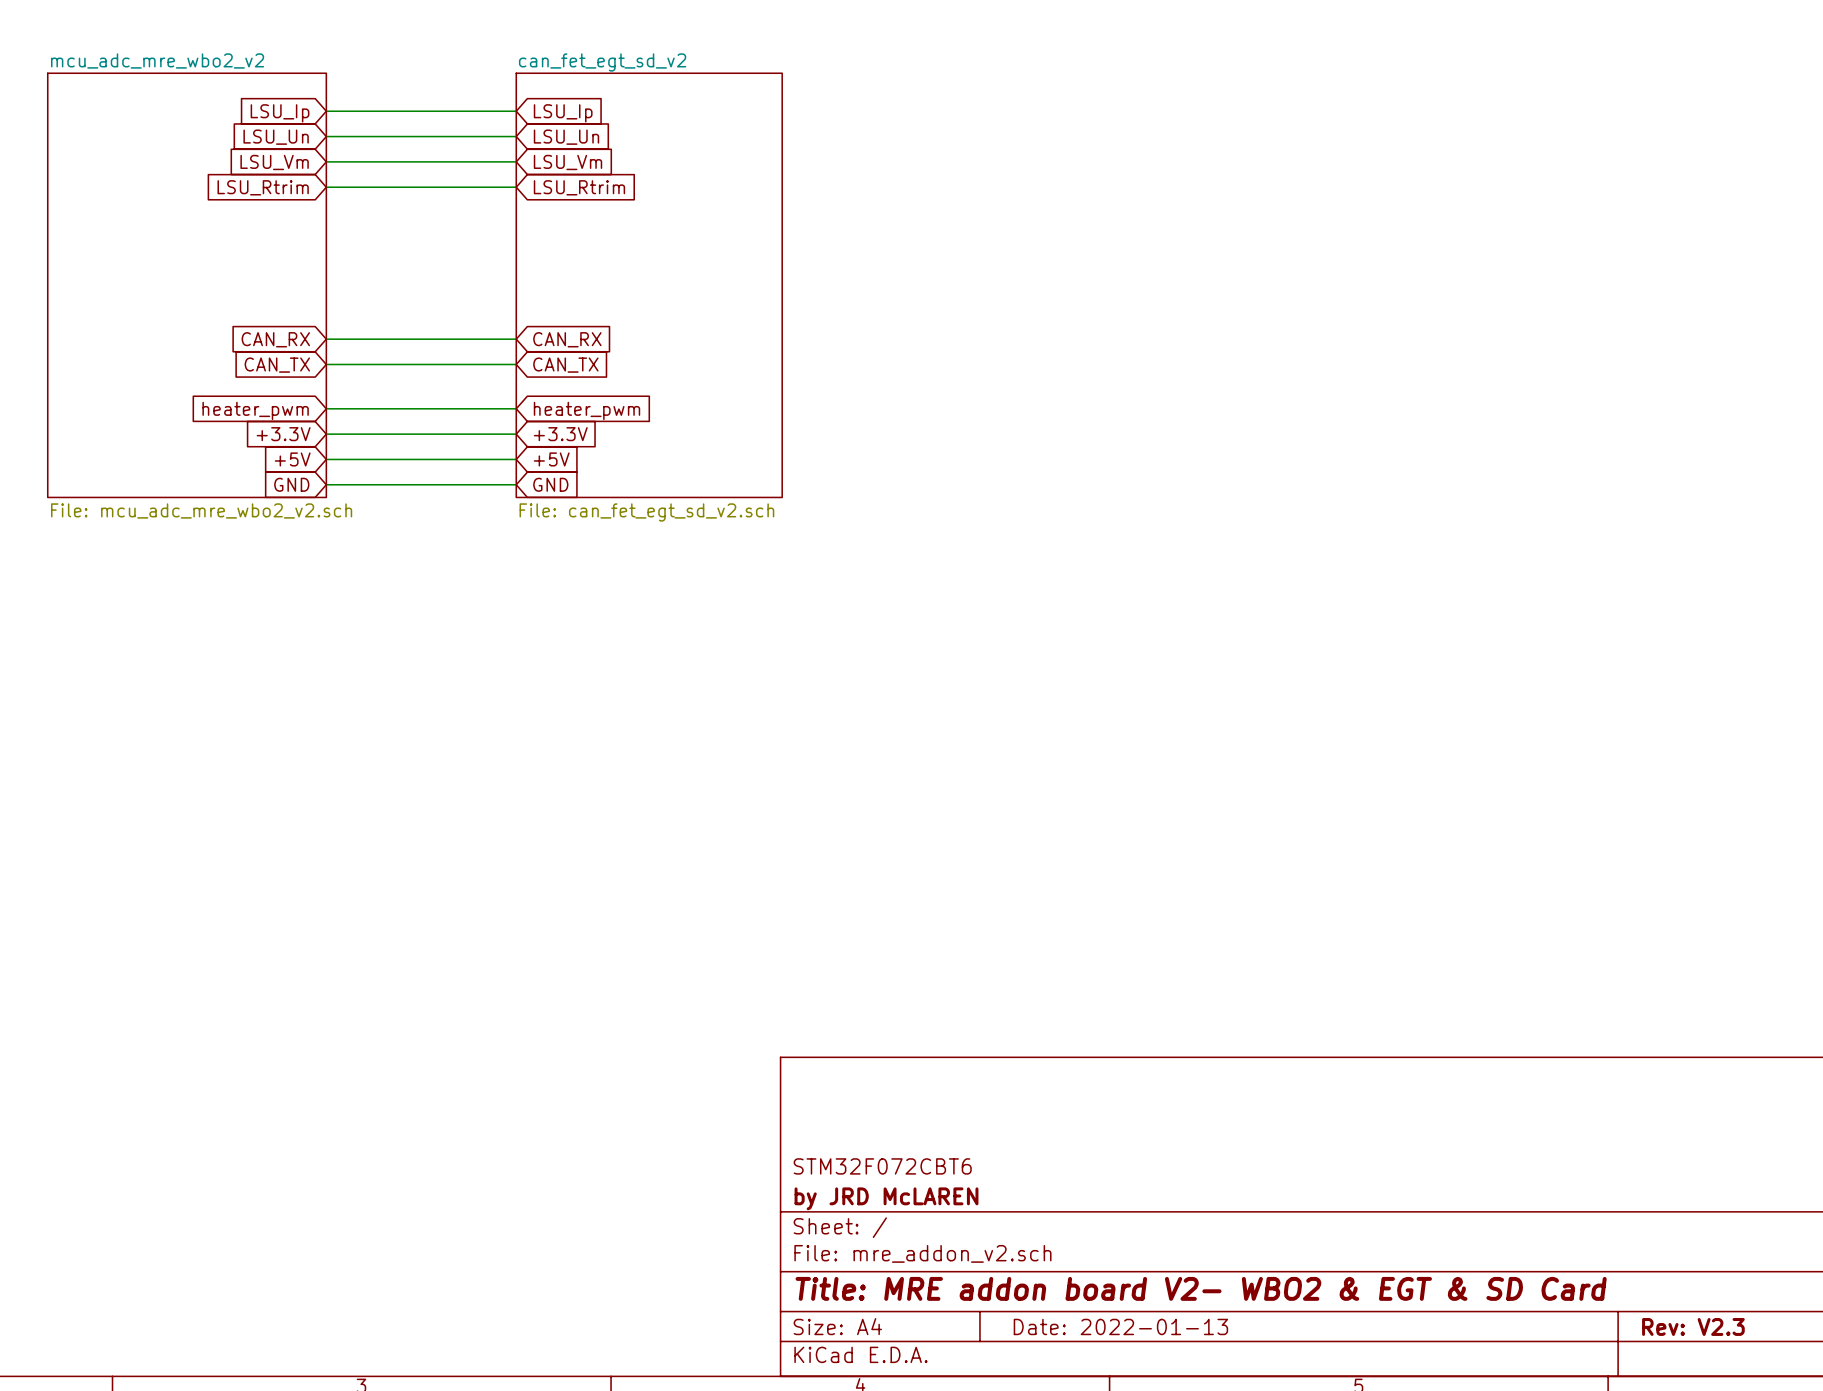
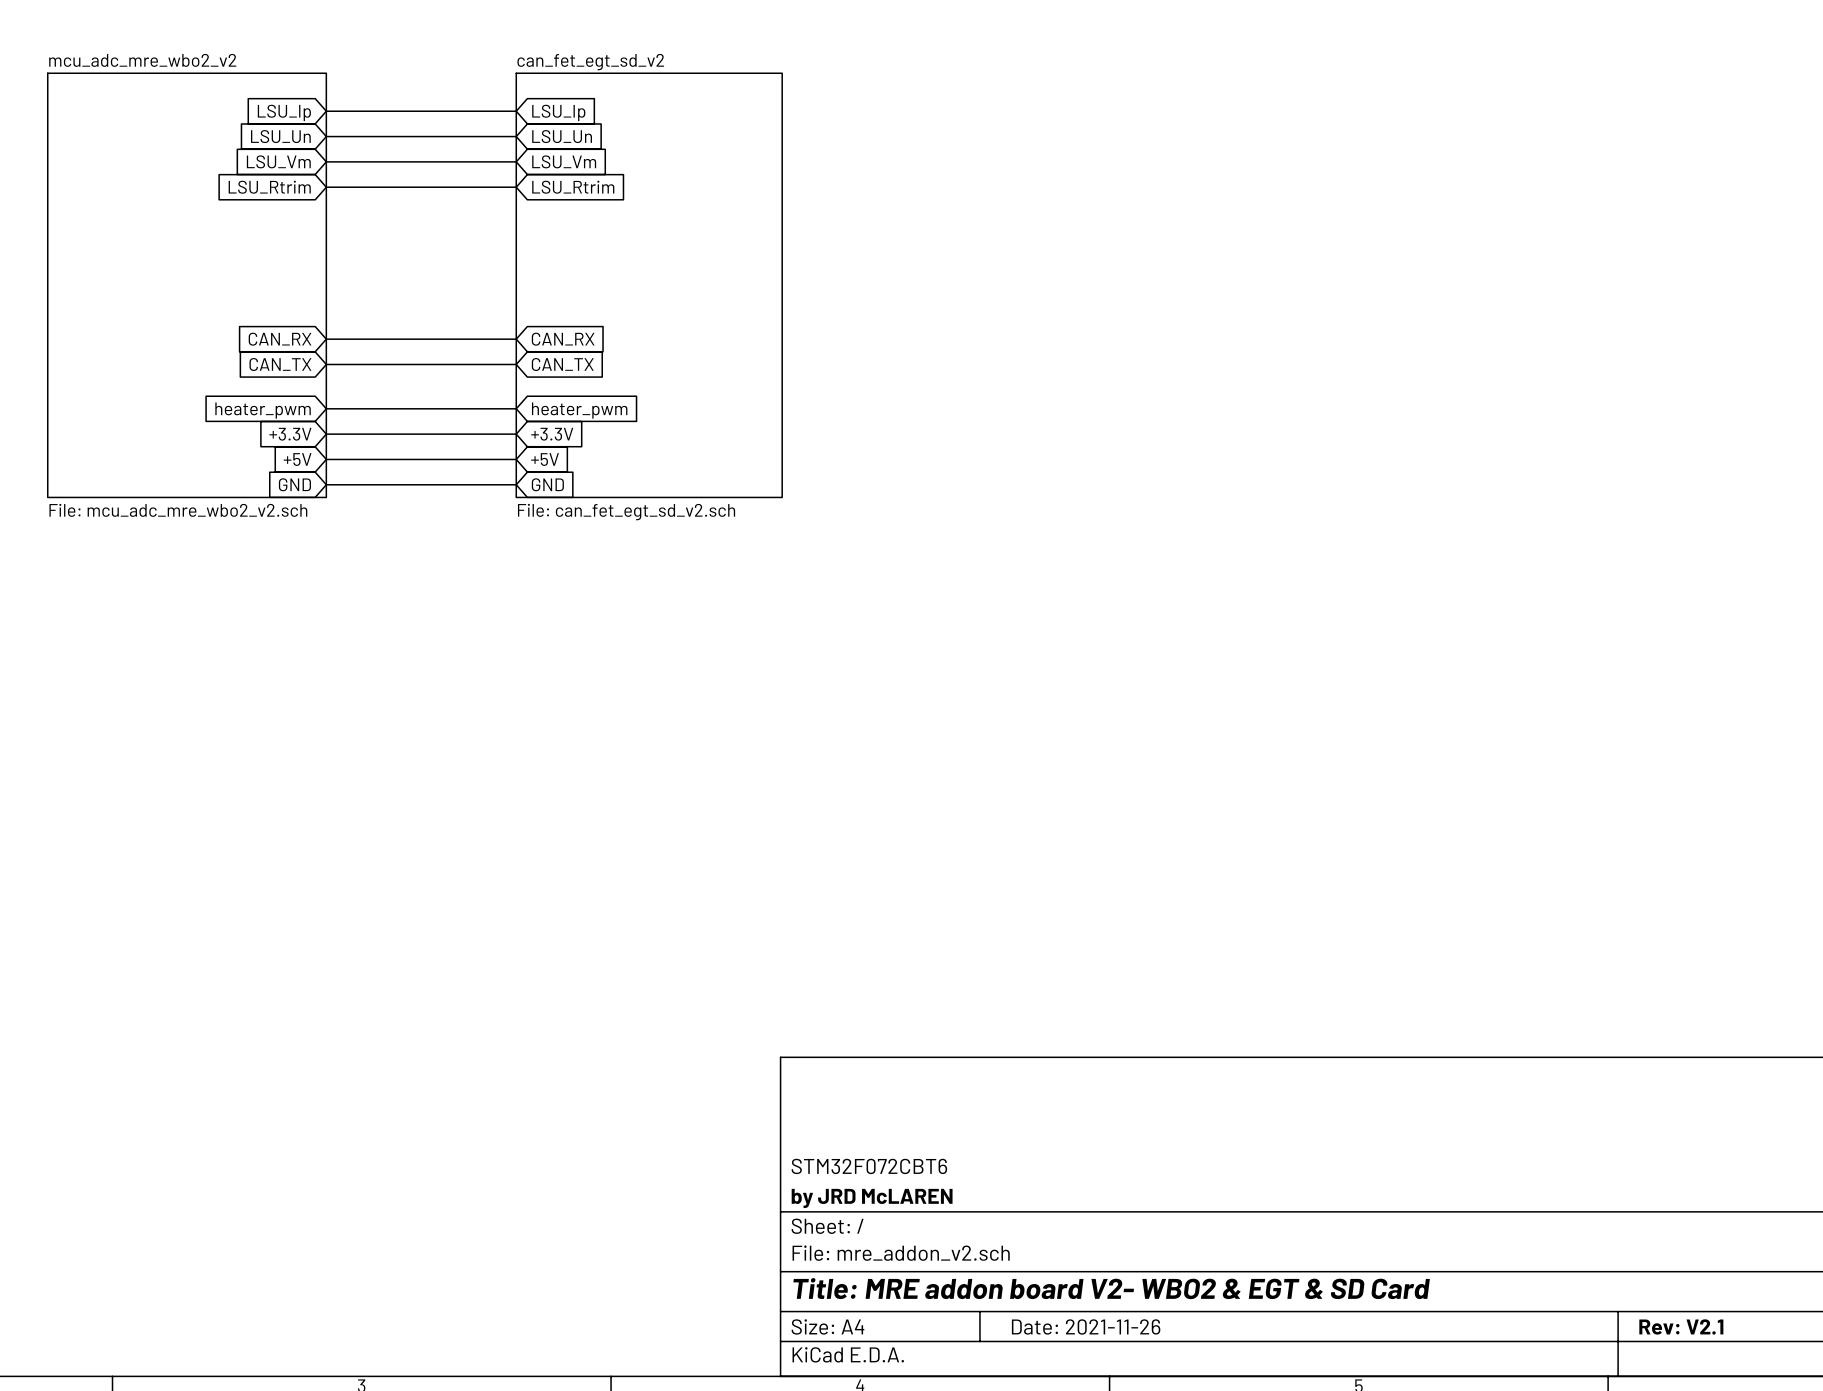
title block: Date: 2022-01-13 (1120, 1326) -> Date: 2021-11-26 (1086, 1326)
title block: Rev: V2.3 (1693, 1326) -> Rev: V2.1 (1681, 1326)

